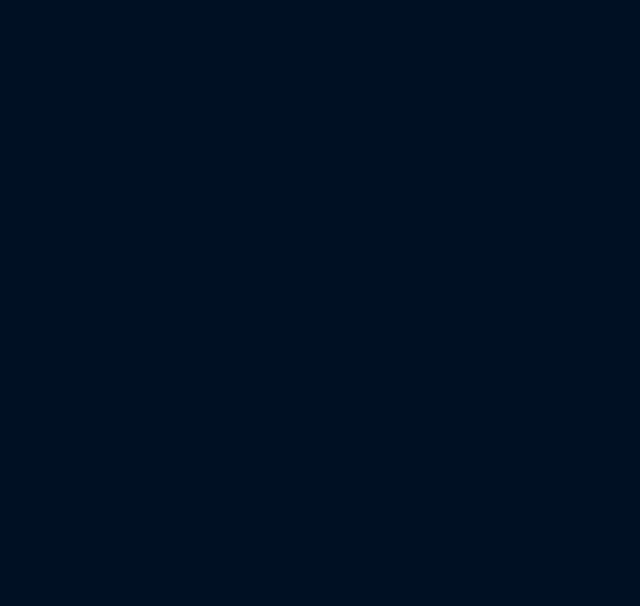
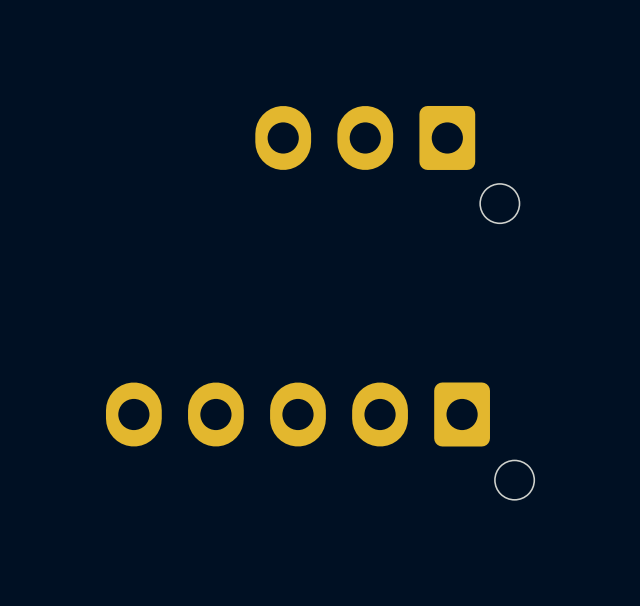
part: none -> (387, 164)
part: none -> (320, 441)

